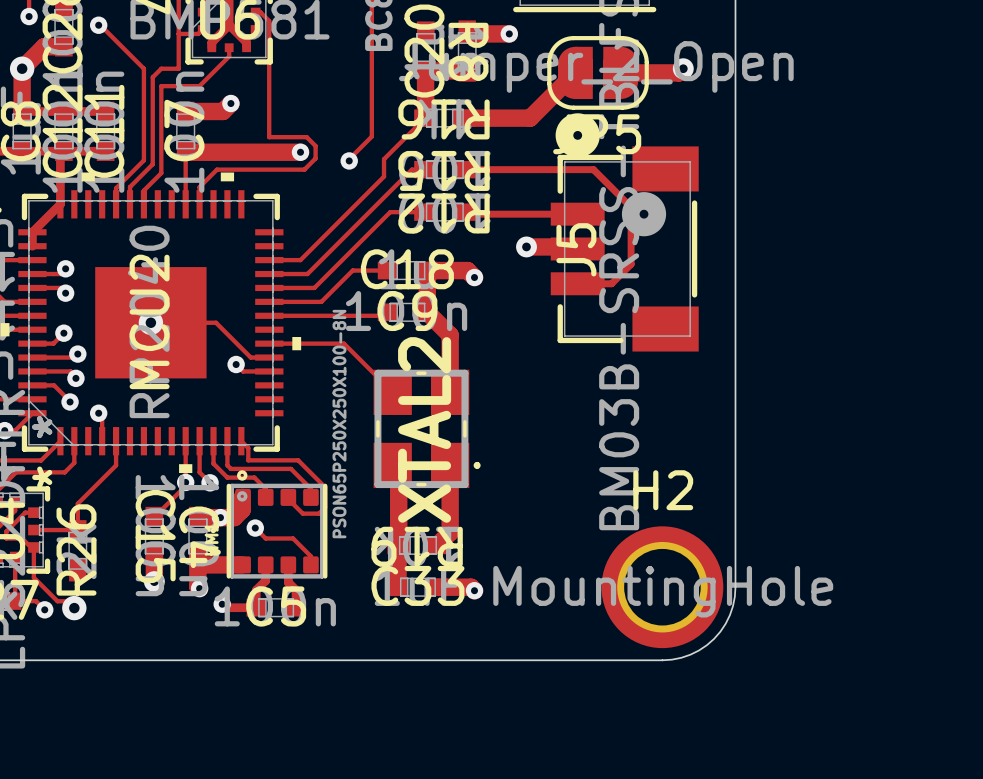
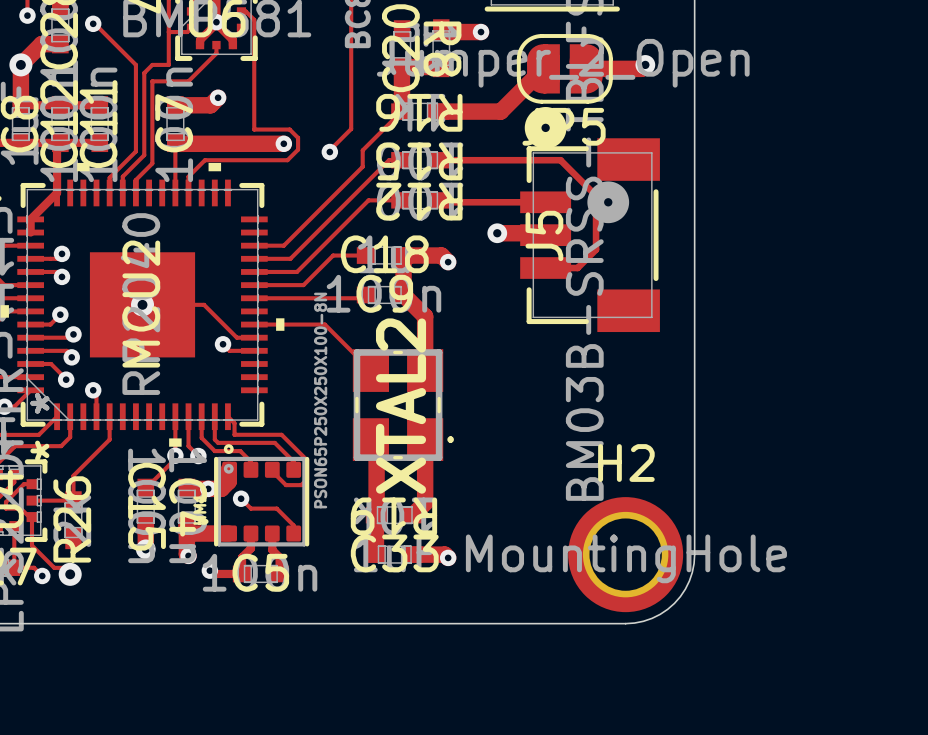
via: none -> (216, 22)

